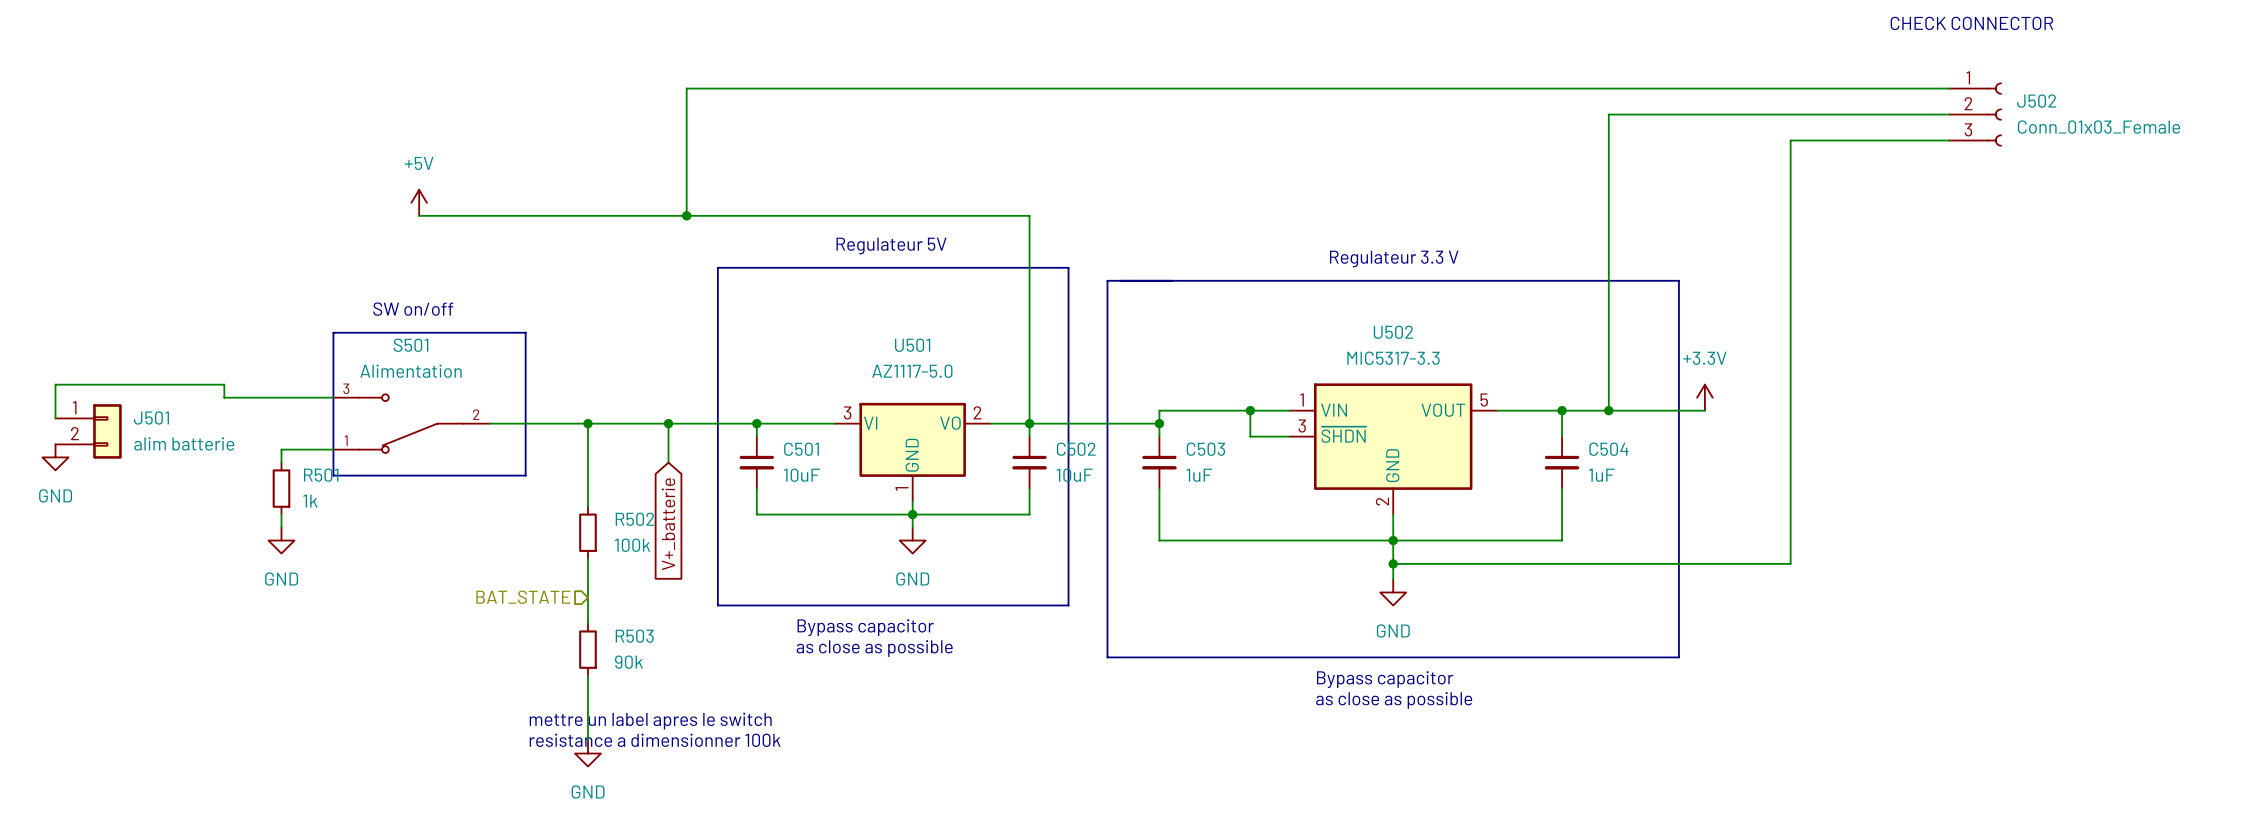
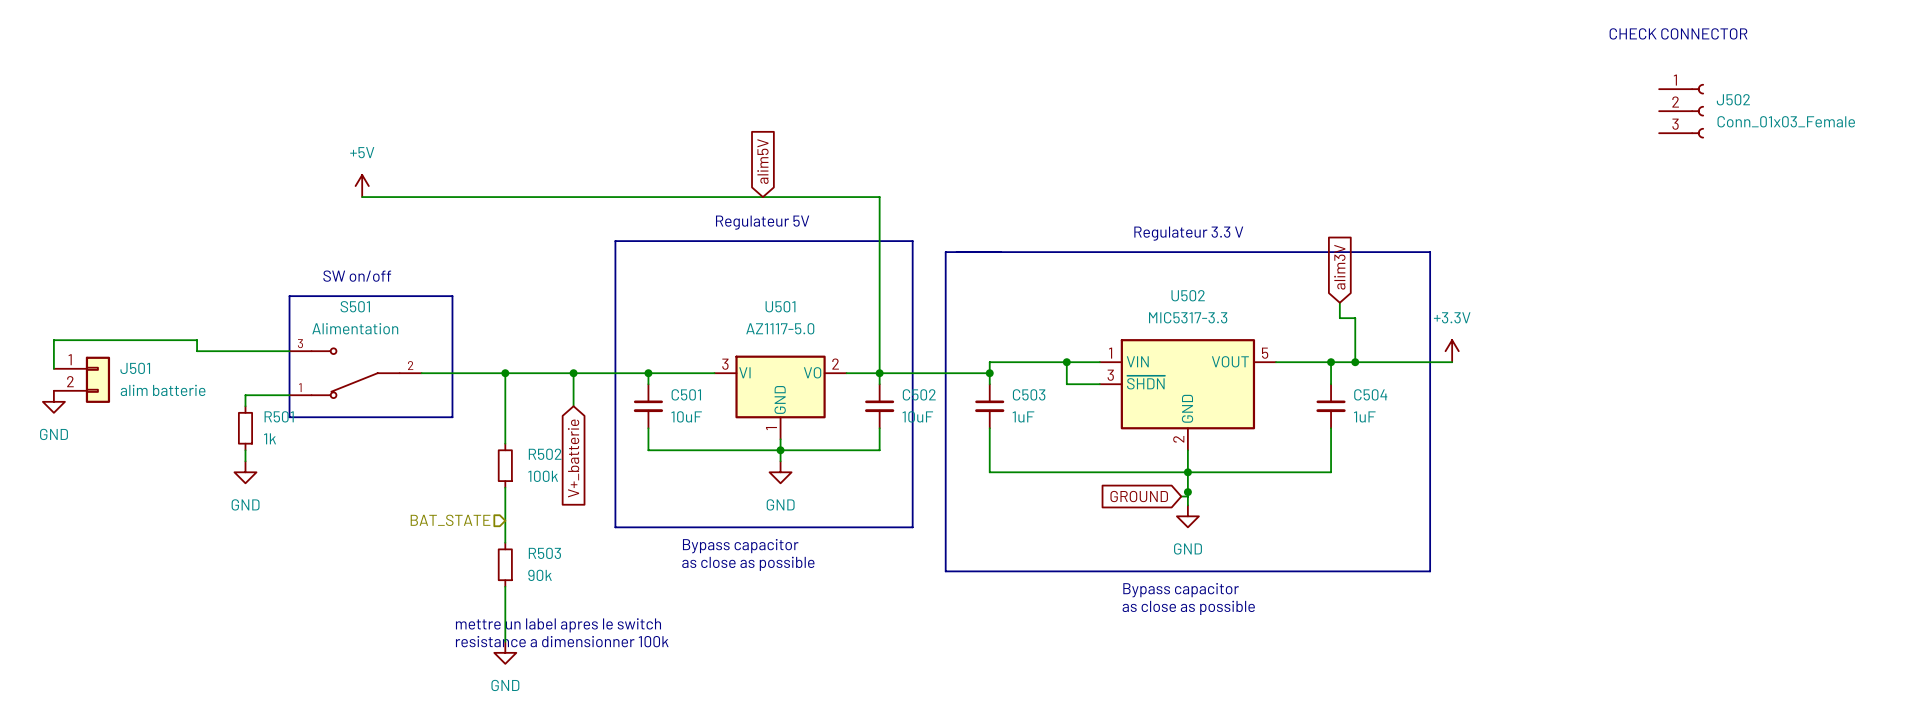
wire: (1949, 88) (686, 88) (686, 215) -> none
wire: (1949, 114) (1608, 114) (1608, 410) -> none
wire: (1949, 140) (1790, 140) (1790, 563) (1393, 563) -> none
global label: none -> alim5V (762, 161)
junction: (686, 215) -> none
global label: none -> alim3V (1339, 267)
wire: none -> (1339, 302) (1339, 318) (1355, 318) (1355, 362)
junction position: (1608, 410) -> (1355, 362)
global label: none -> GROUND (1139, 496)
wire: none -> (1181, 496) (1187, 496)

